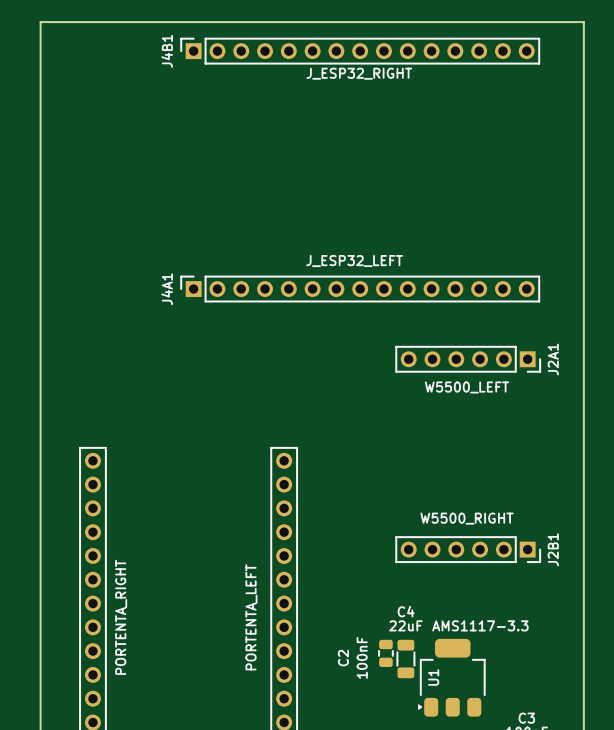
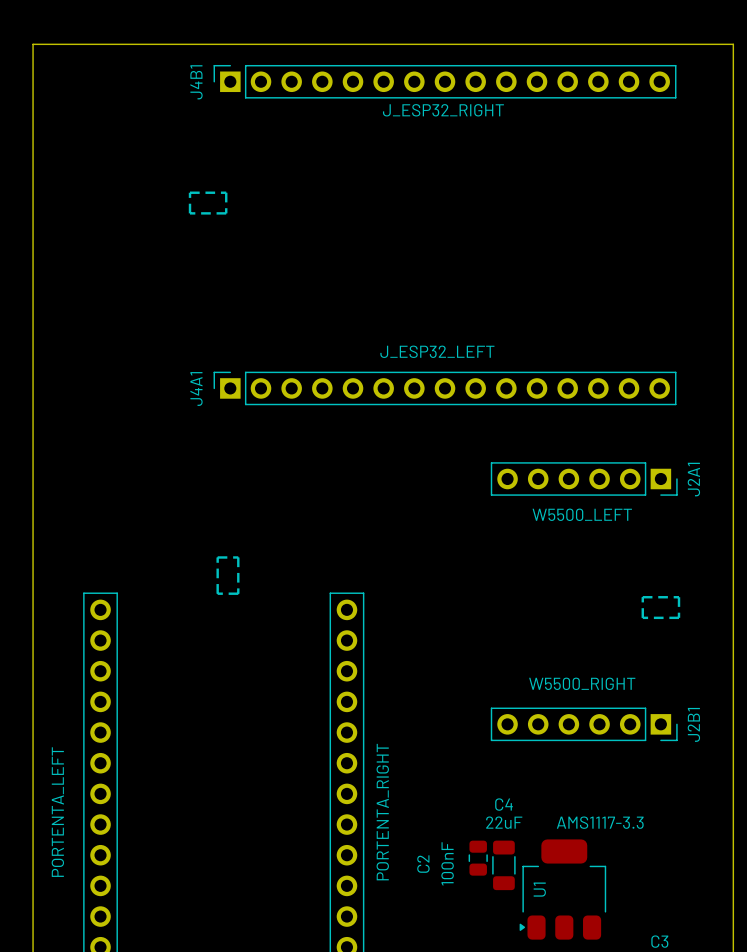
line: none -> (190, 192) (226, 192) (226, 213) (190, 213) (190, 192)
line: none -> (217, 557) (238, 557) (238, 593) (217, 593) (217, 557)
line: none -> (642, 597) (679, 597) (679, 617) (642, 617) (642, 597)
part value: PORTENTA_RIGHT (121, 617) -> PORTENTA_LEFT (57, 812)
part value: PORTENTA_LEFT (251, 617) -> PORTENTA_RIGHT (382, 812)

